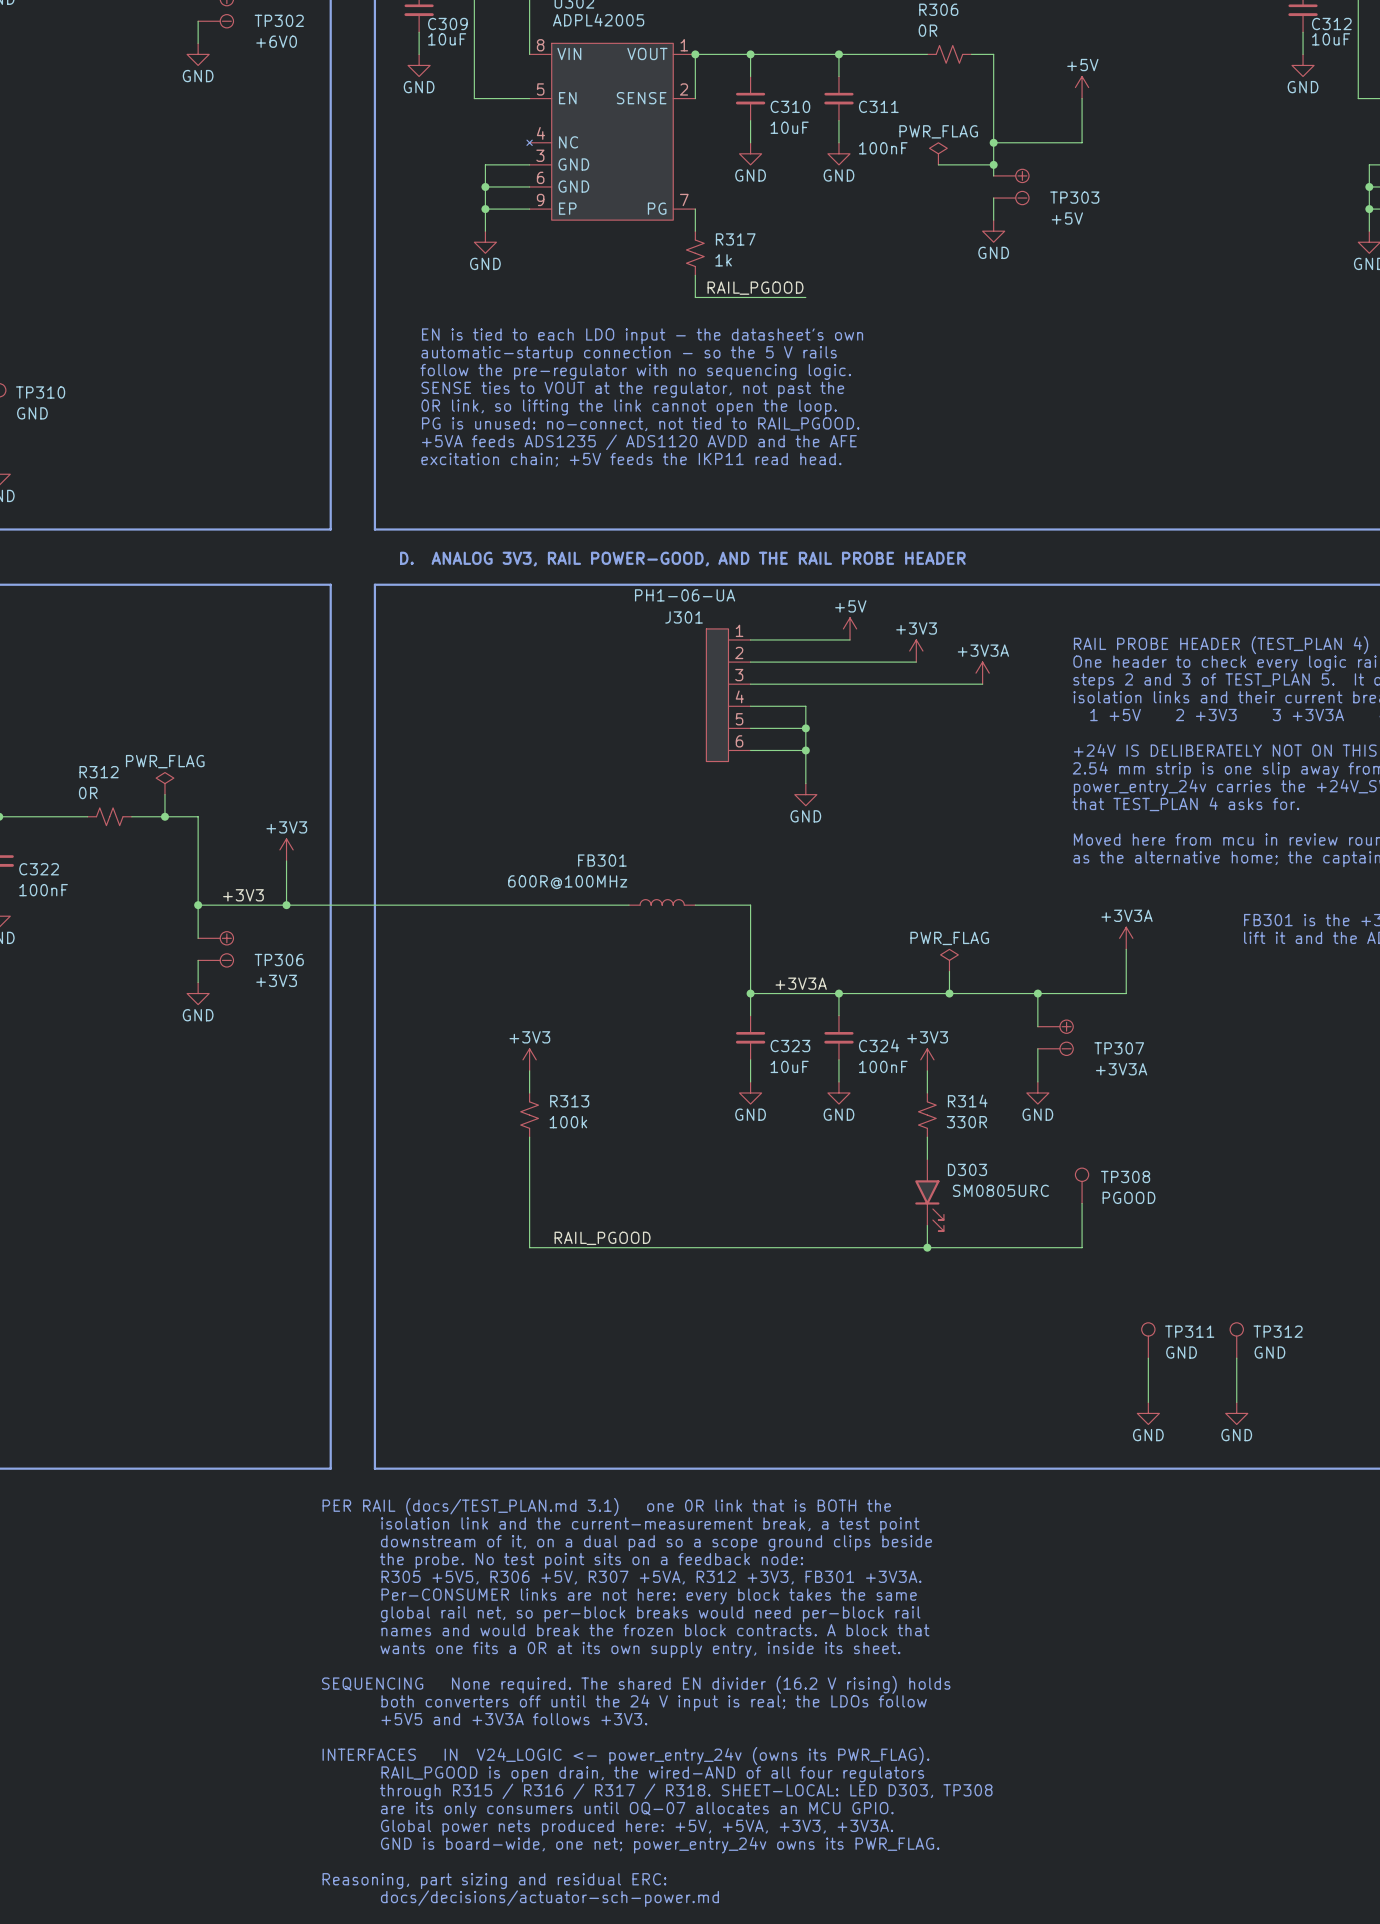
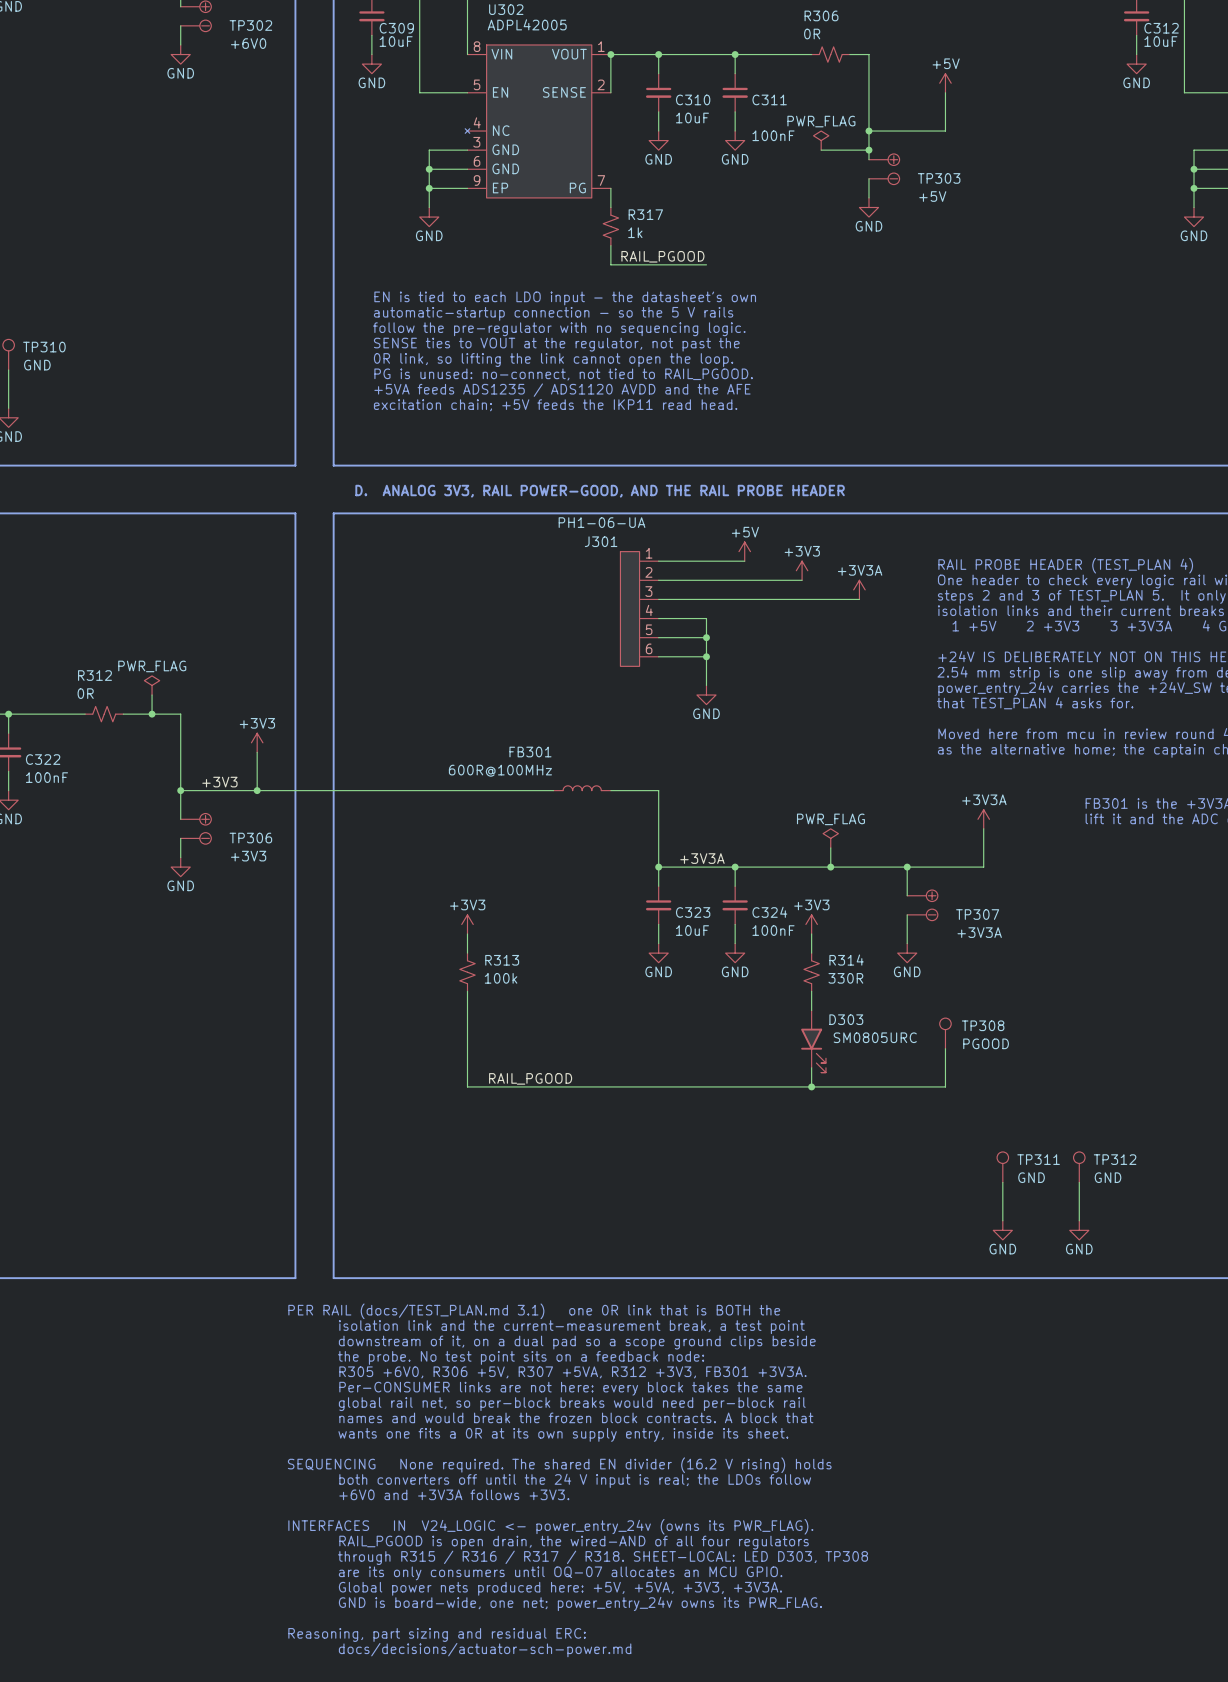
text: R305 +5V5, R306 +5V, R307 +5VA, R312 +3V3, FB301 +3V3A. (651, 1577) -> R305 +6V0, R306 +5V, R307 +5VA, R312 +3V3, FB301 +3V3A. (572, 1372)
text: +5V5 and +3V3A follows +3V3. (514, 1719) -> +6V0 and +3V3A follows +3V3. (454, 1494)

